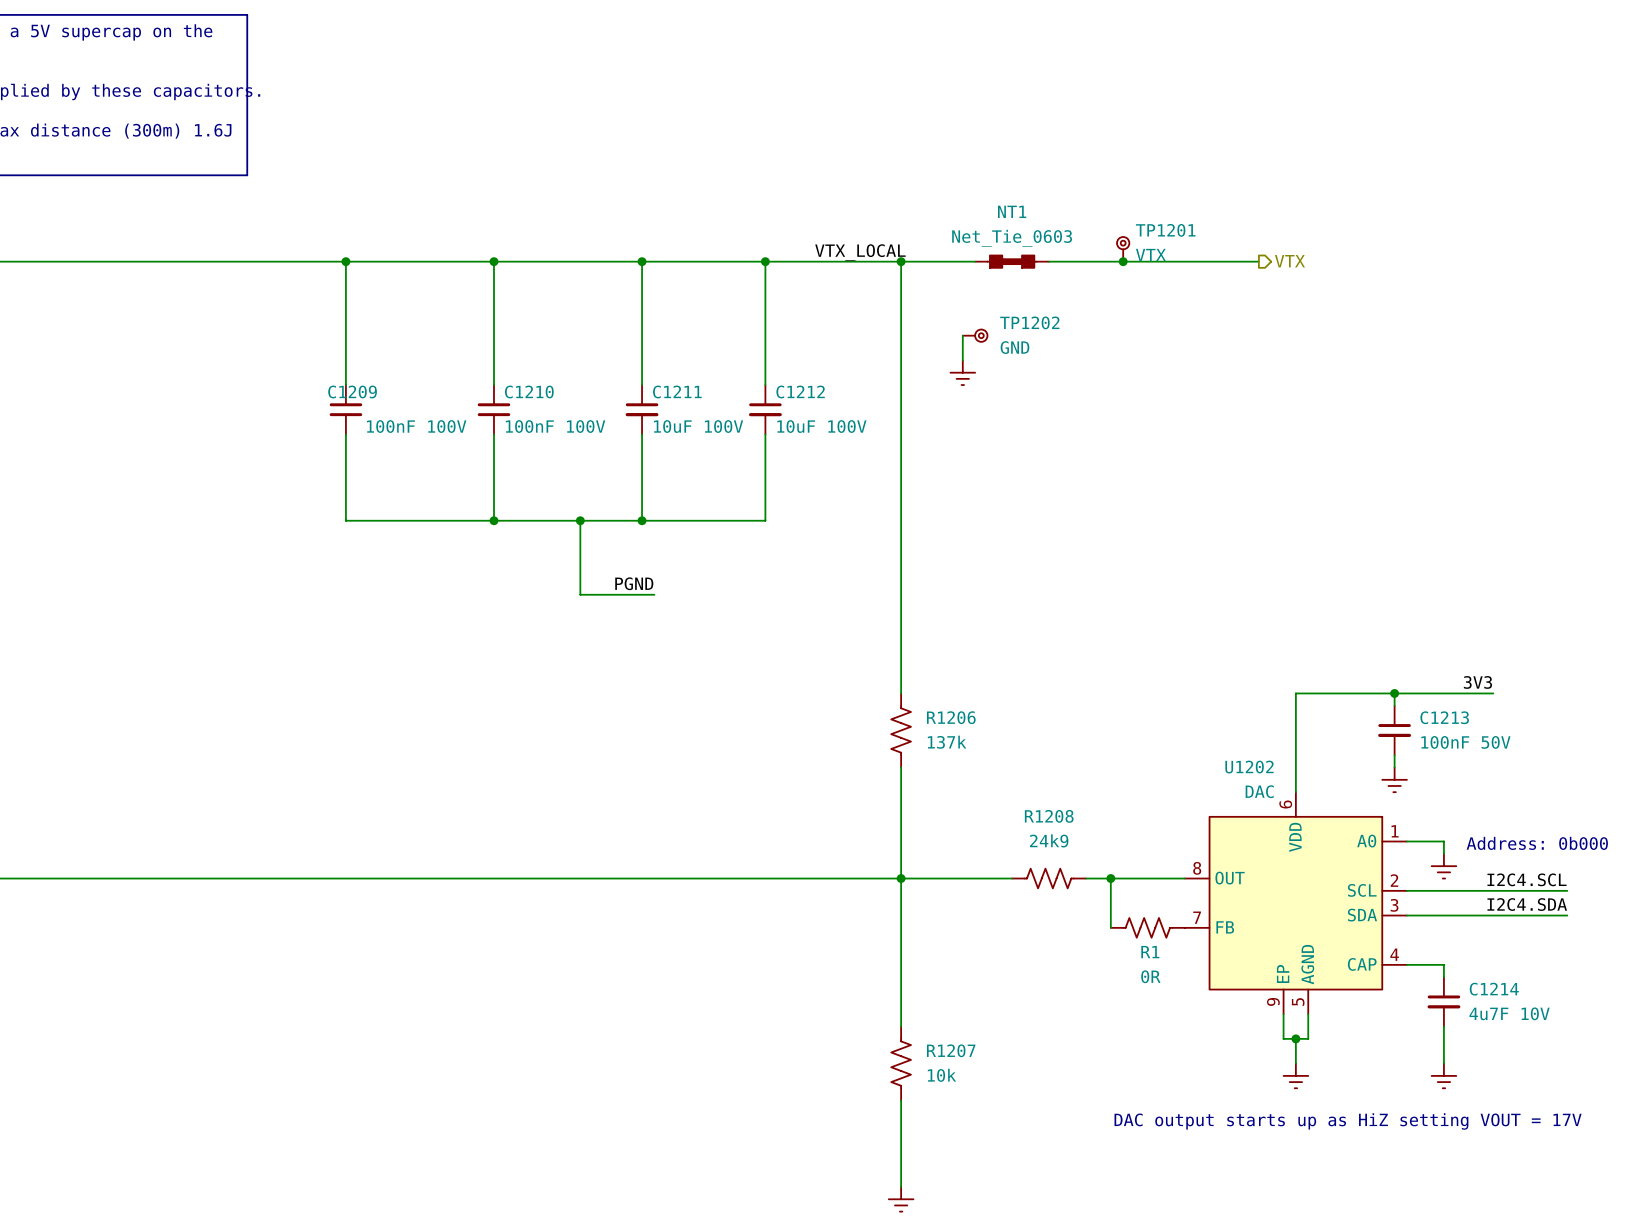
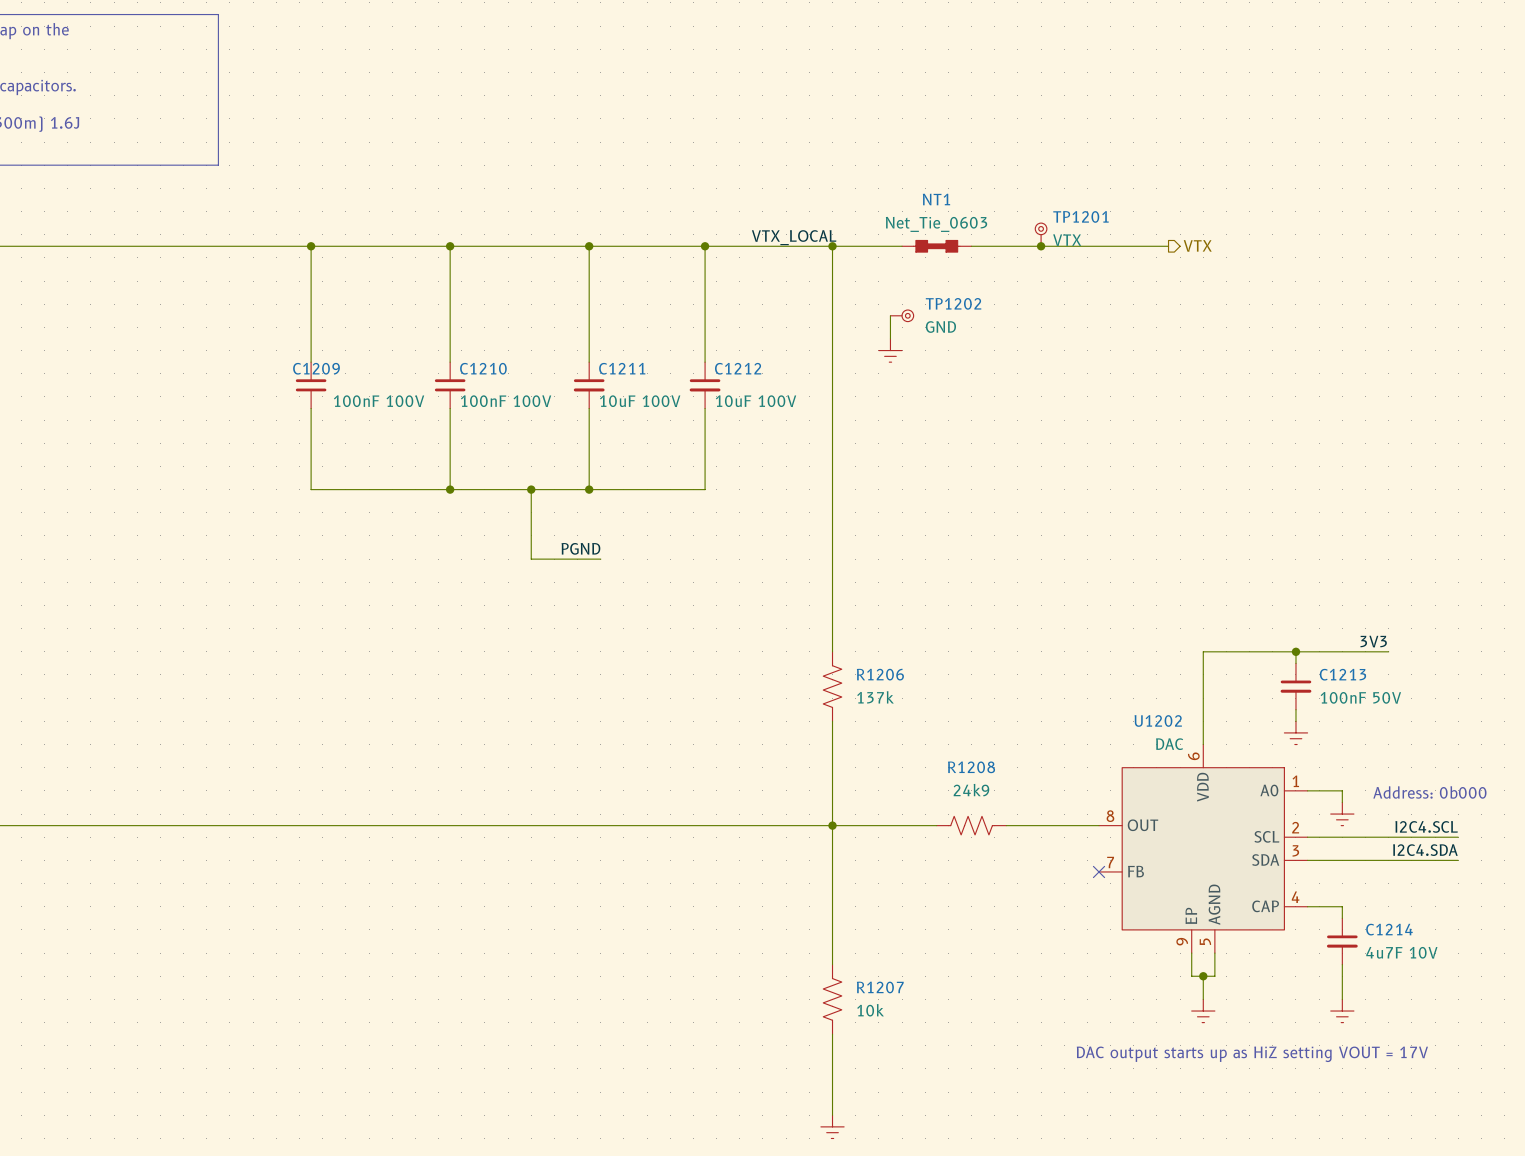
wire: (1110, 878) (1110, 927) -> none
junction: (1110, 878) -> none
R1: 0R (1147, 927) -> none
no-connect mark: none -> (1099, 871)

